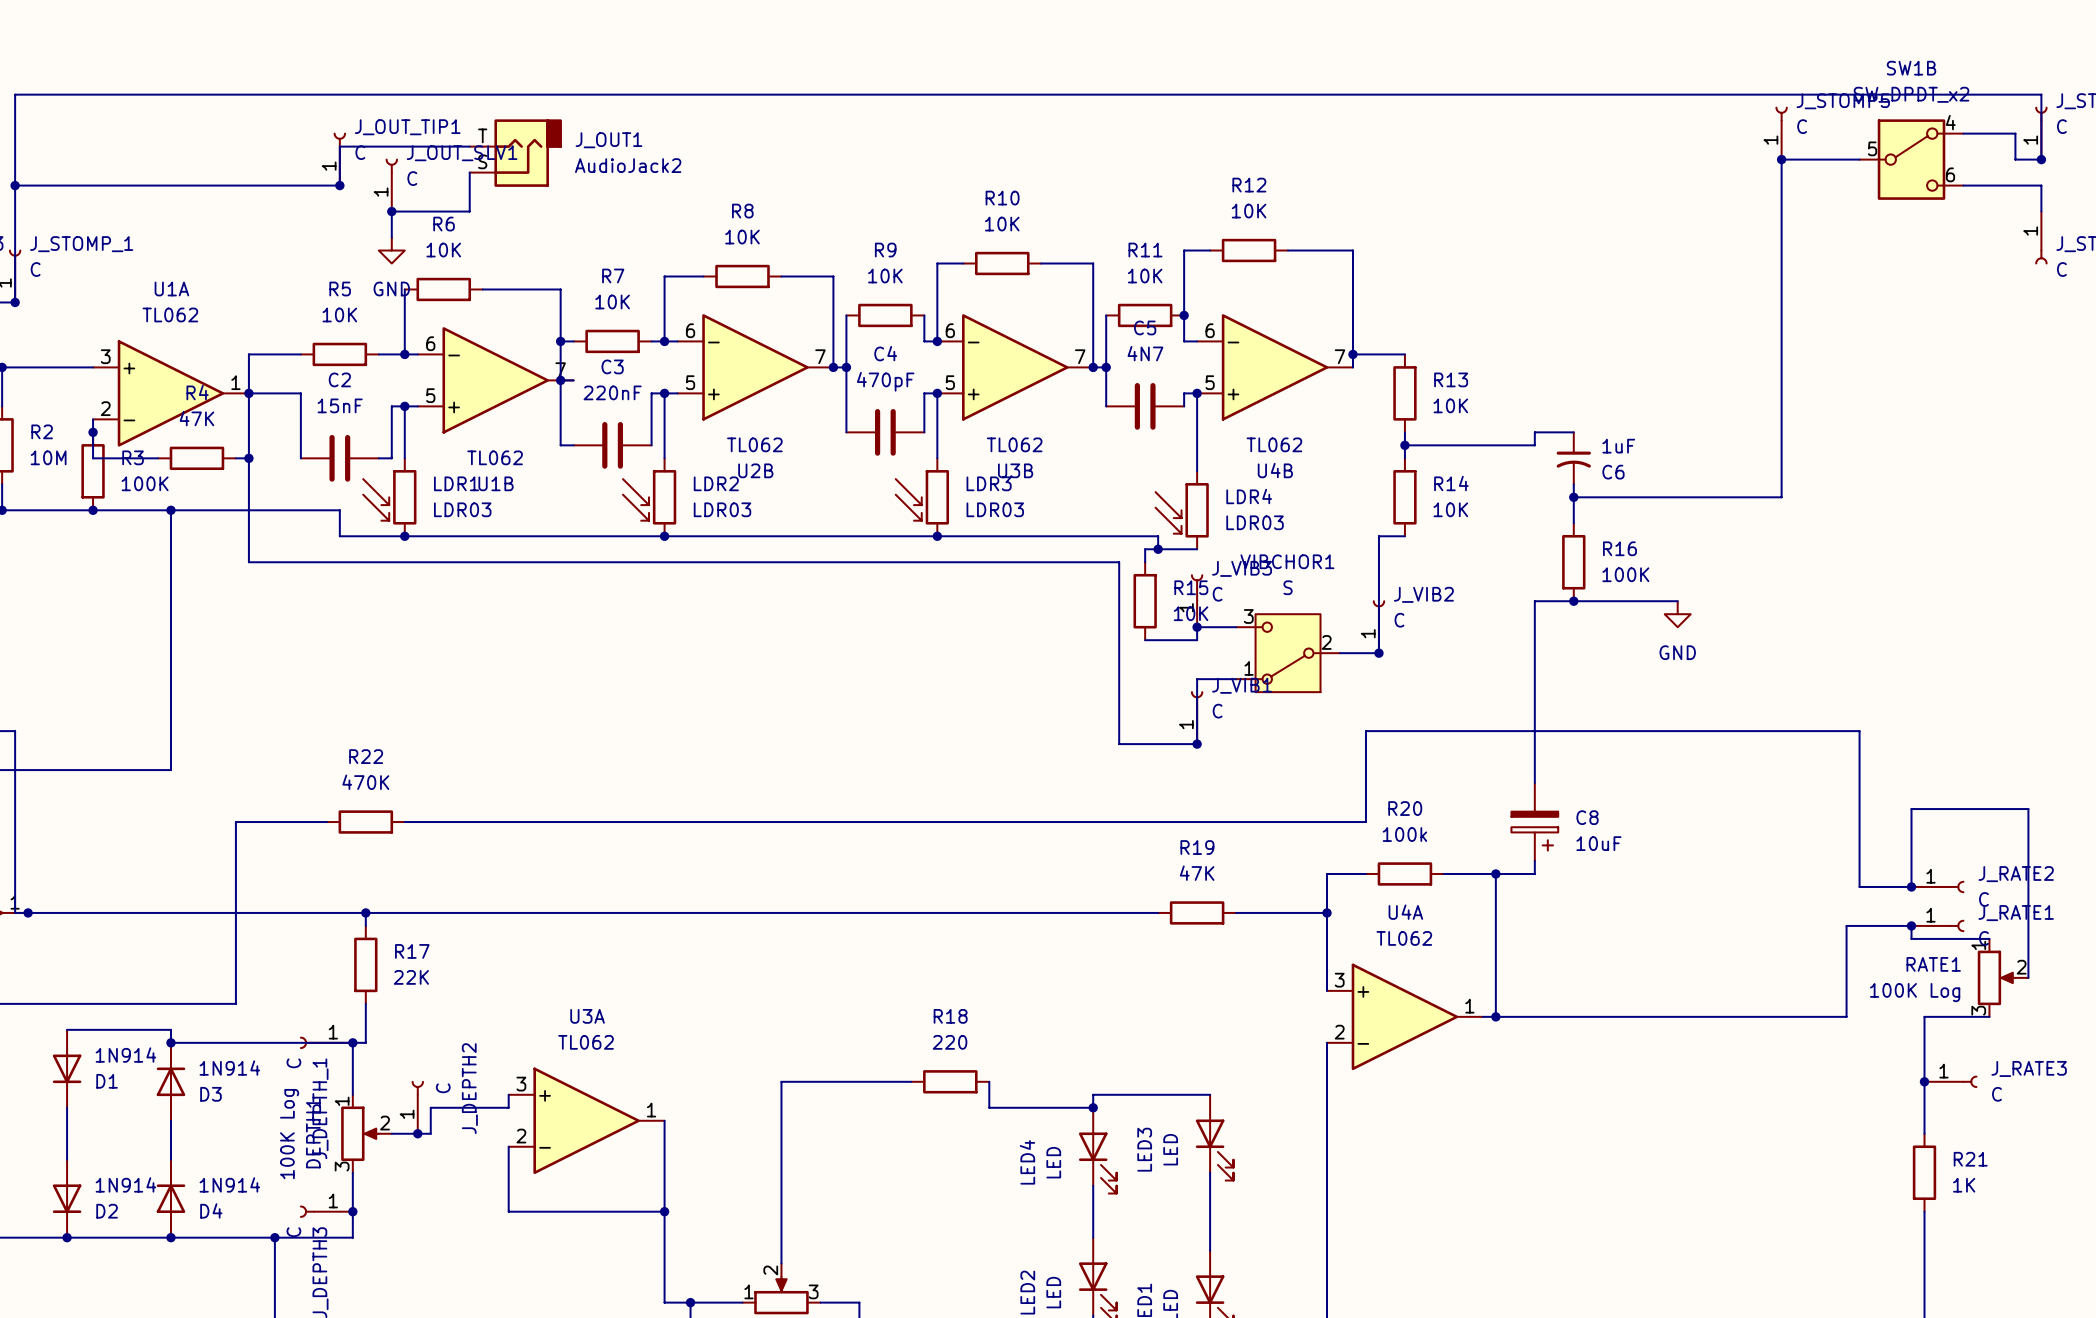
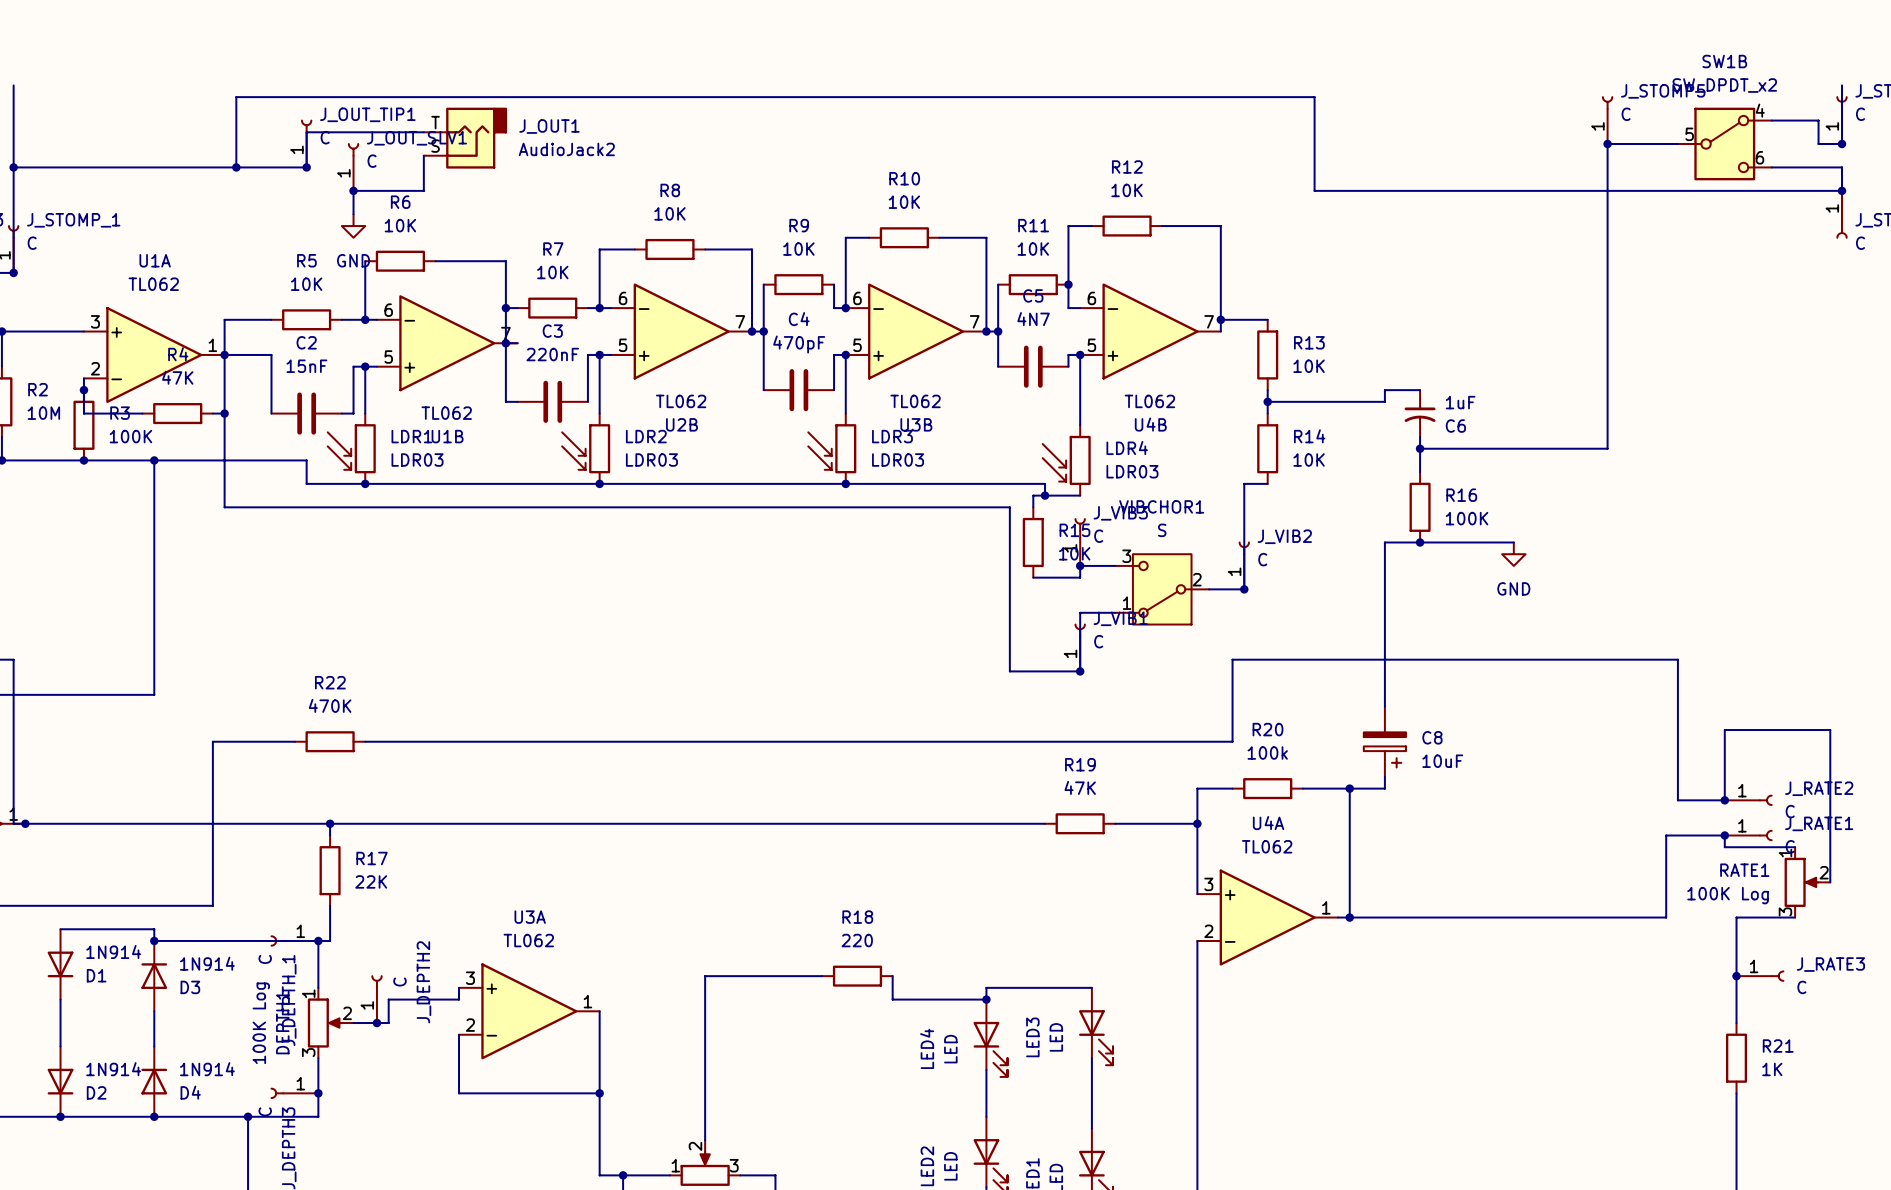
wire: (15, 94) (2041, 94) -> none
wire: none -> (236, 167) (236, 97) (1314, 97) (1314, 190) (1842, 190)
junction: none -> (236, 167)
junction: none -> (1842, 190)

